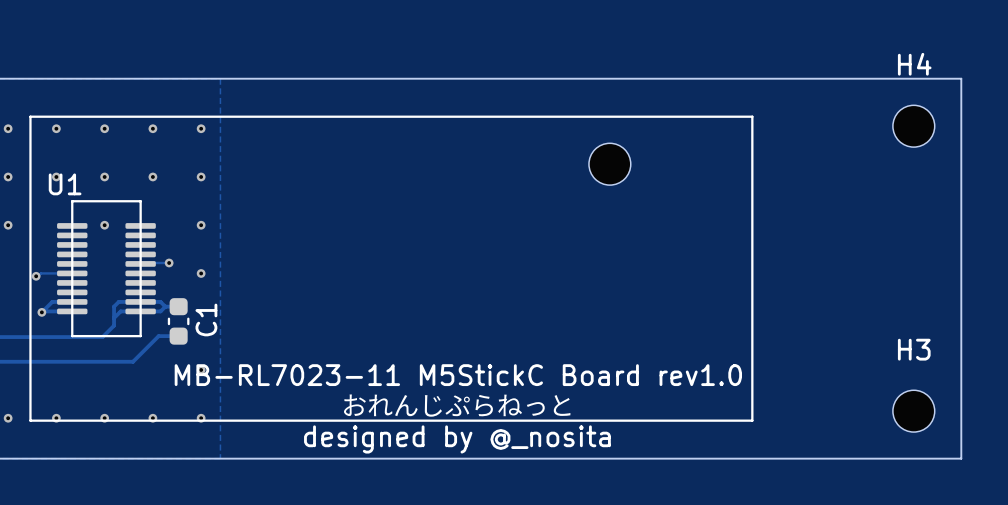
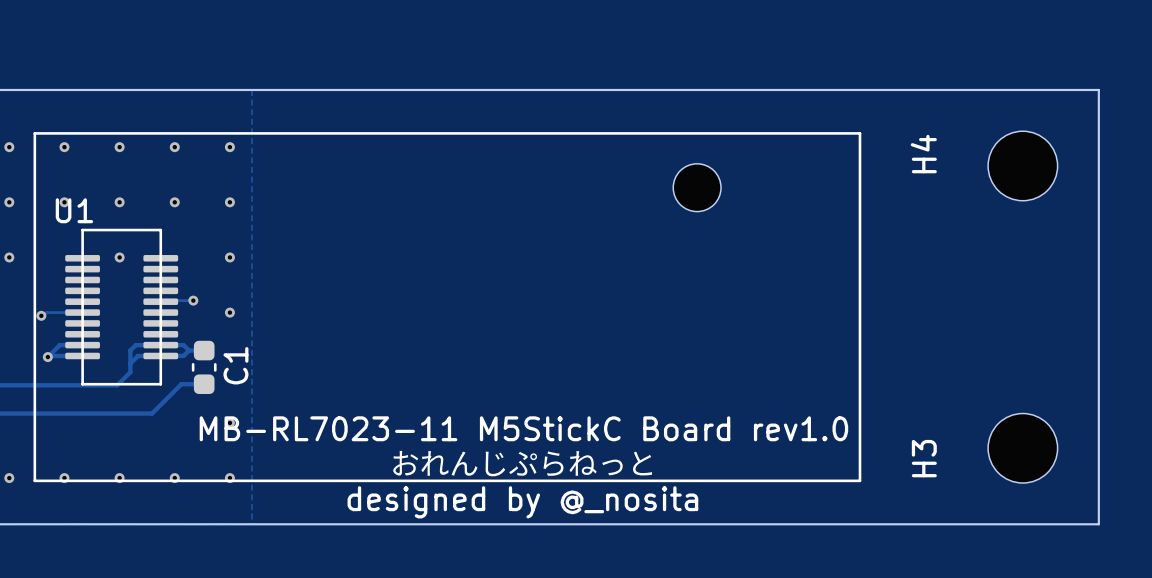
H4 name position: H4 (914, 64) -> H4 (923, 154)
H4 footprint: [892, 105, 935, 148] -> [988, 131, 1058, 201]
H3 name position: H3 (914, 349) -> H3 (924, 458)
H3 footprint: [892, 390, 935, 433] -> [988, 413, 1058, 484]

